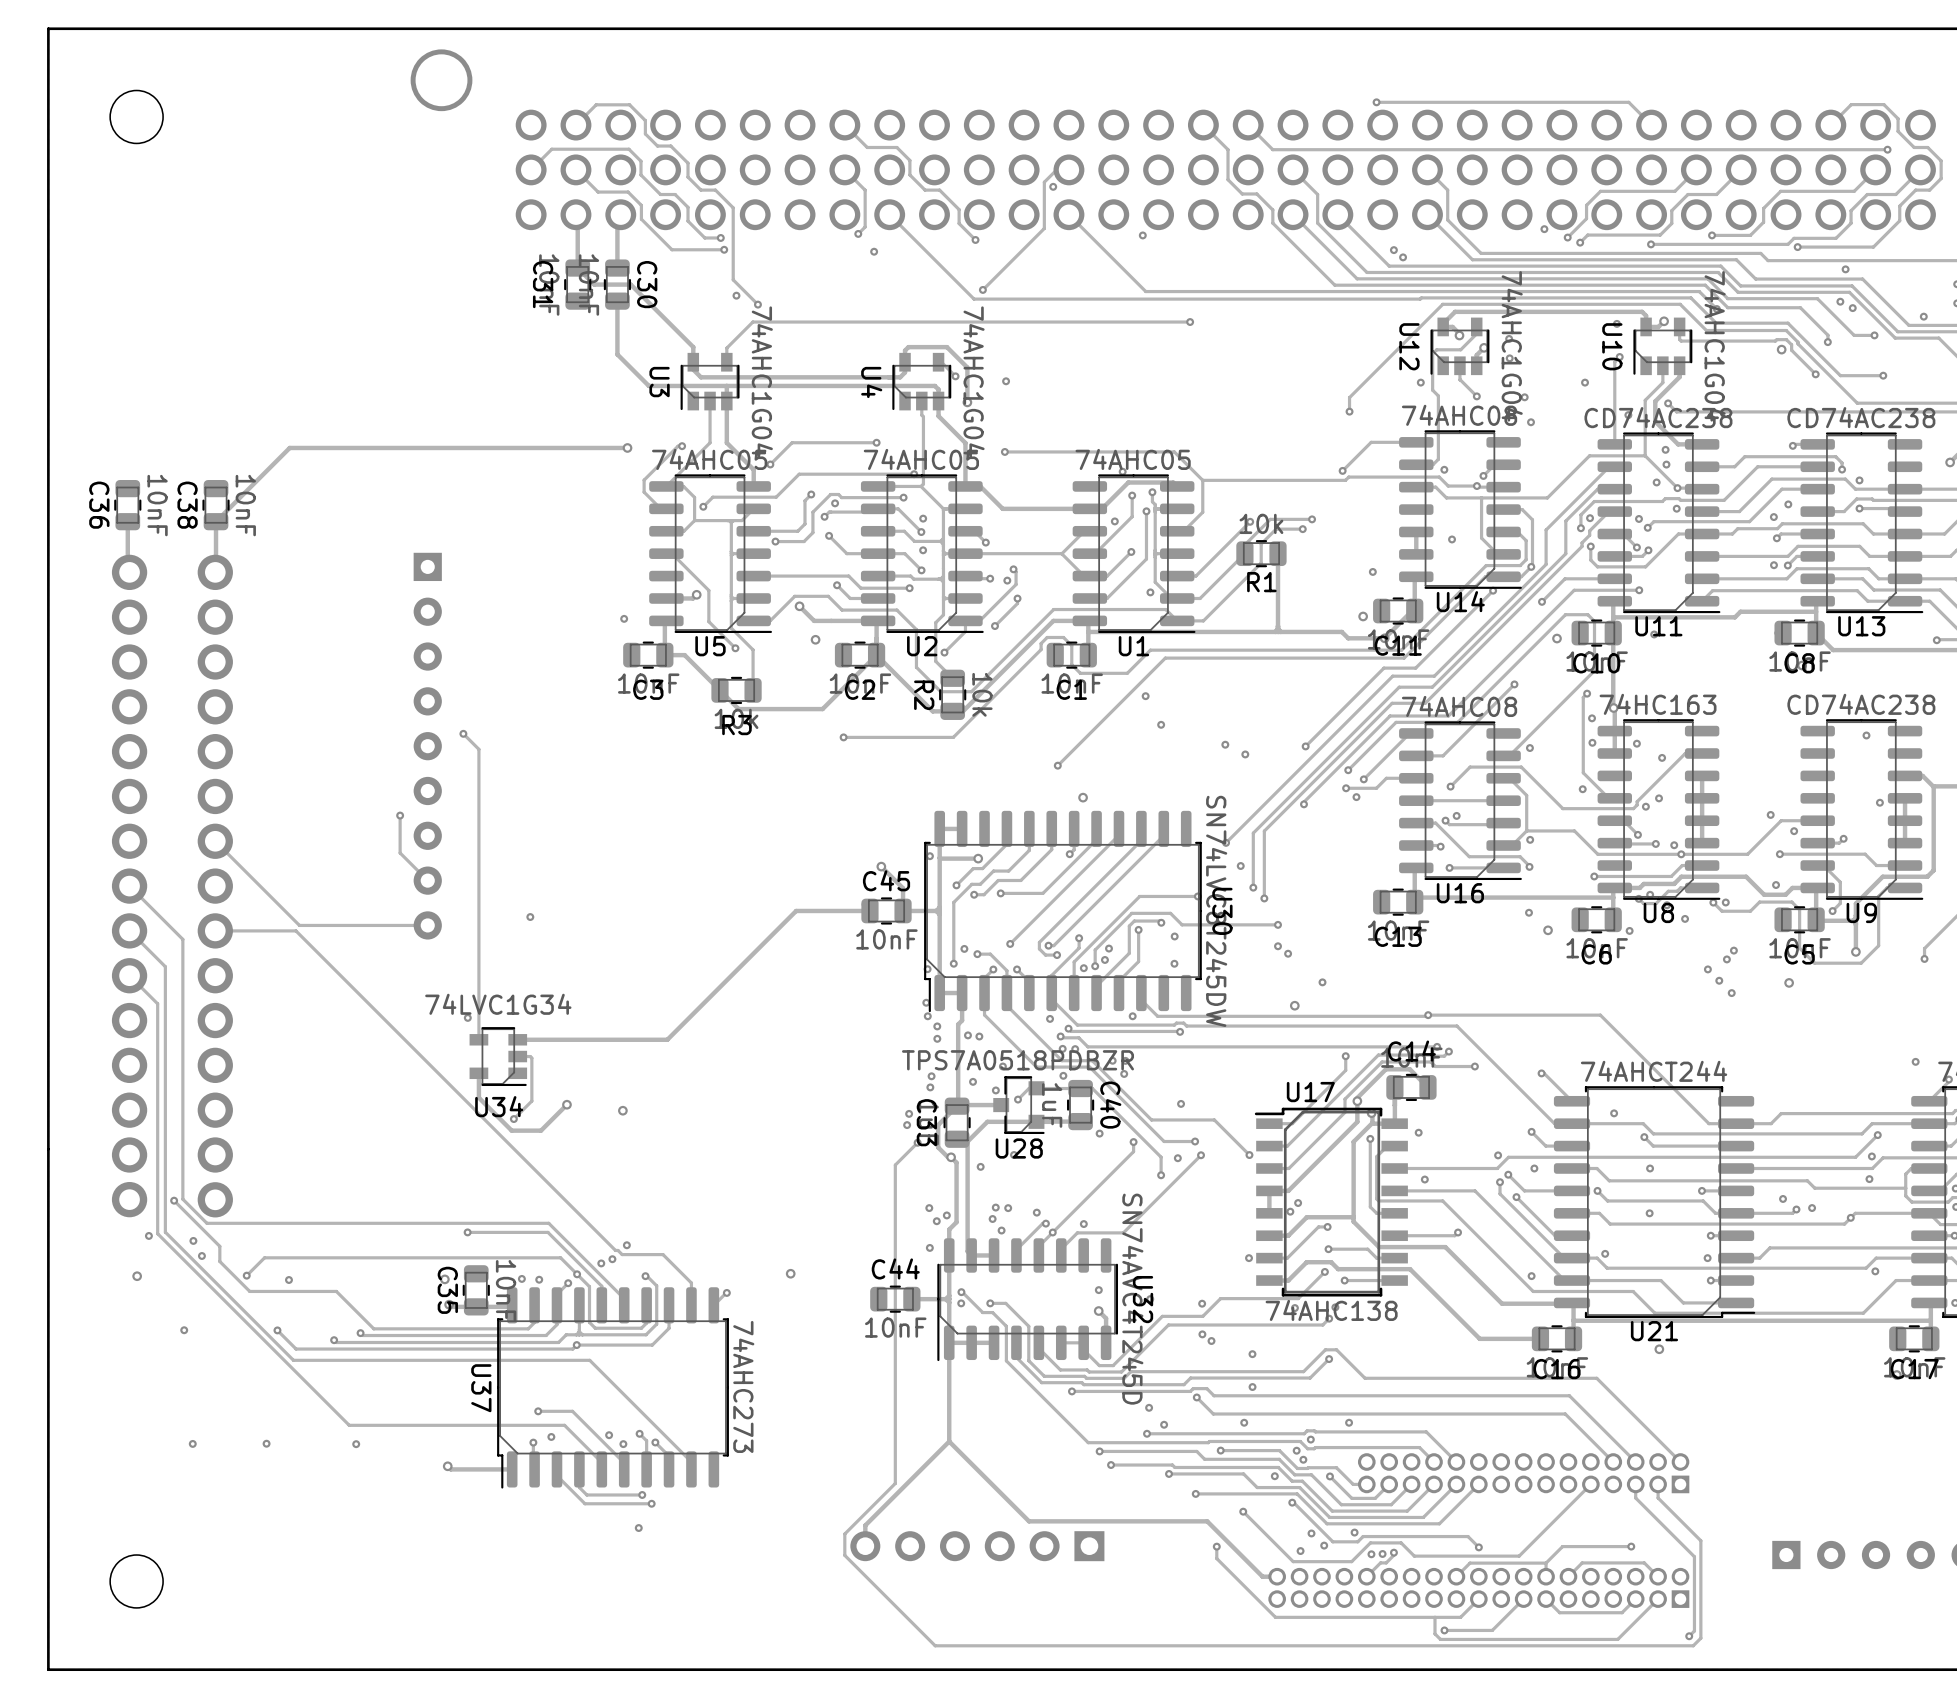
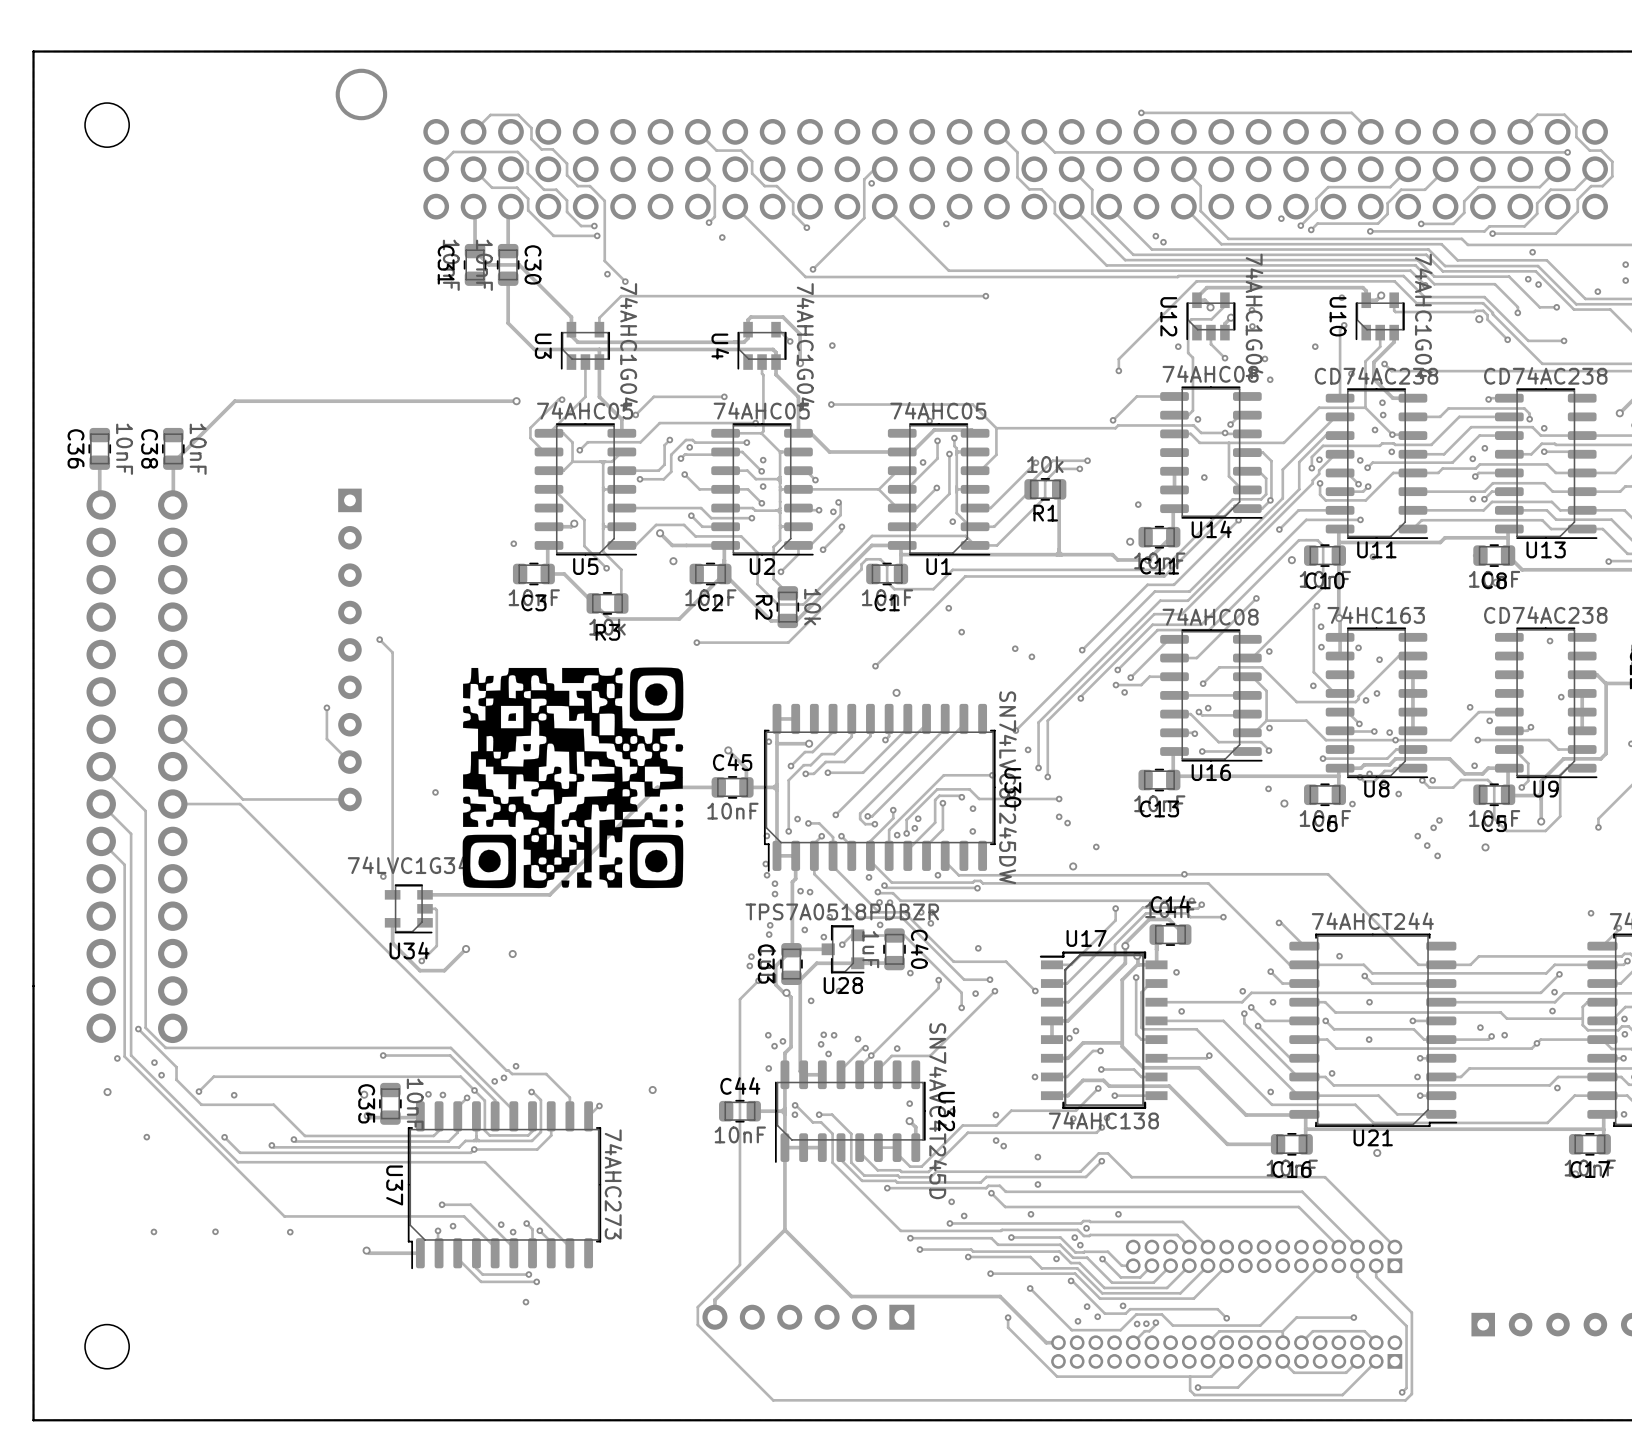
drawing: none -> [462, 667, 684, 889]

